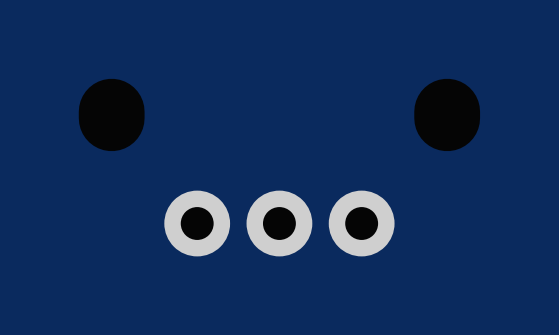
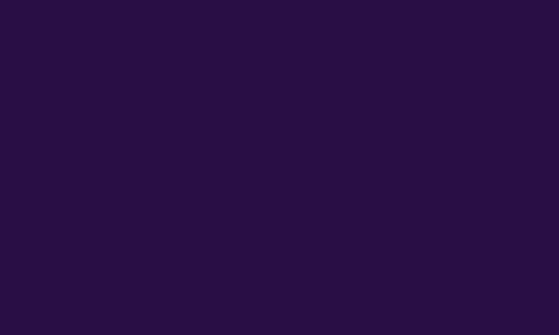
part: (279, 167) -> none

